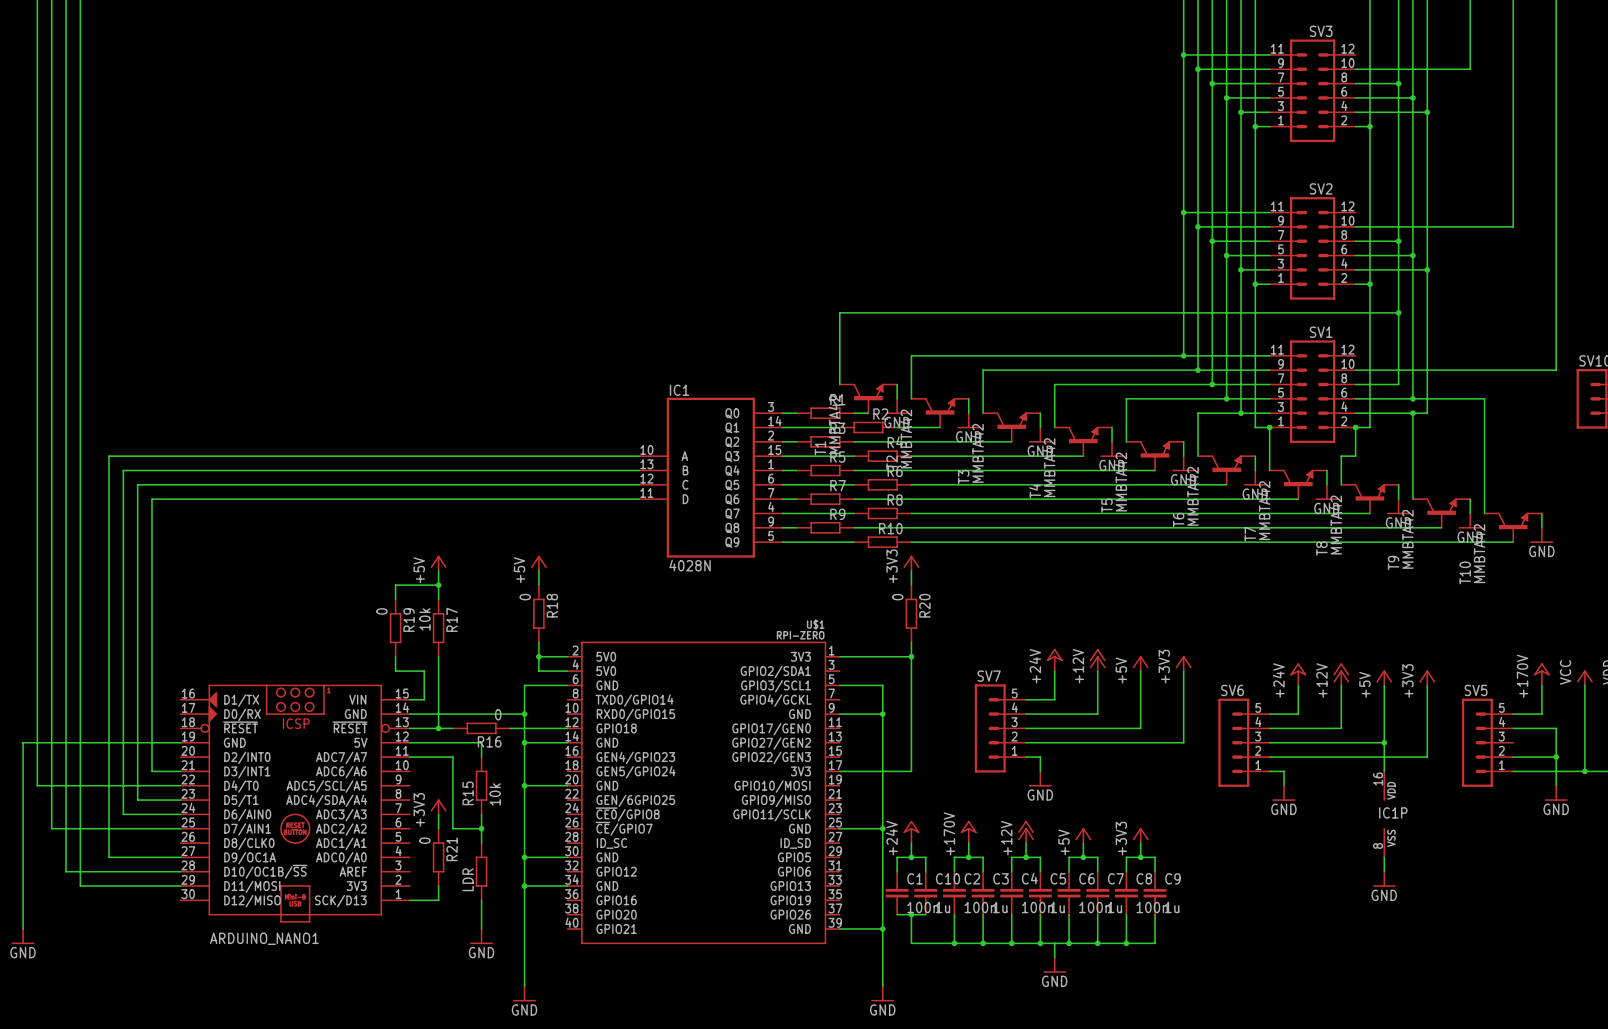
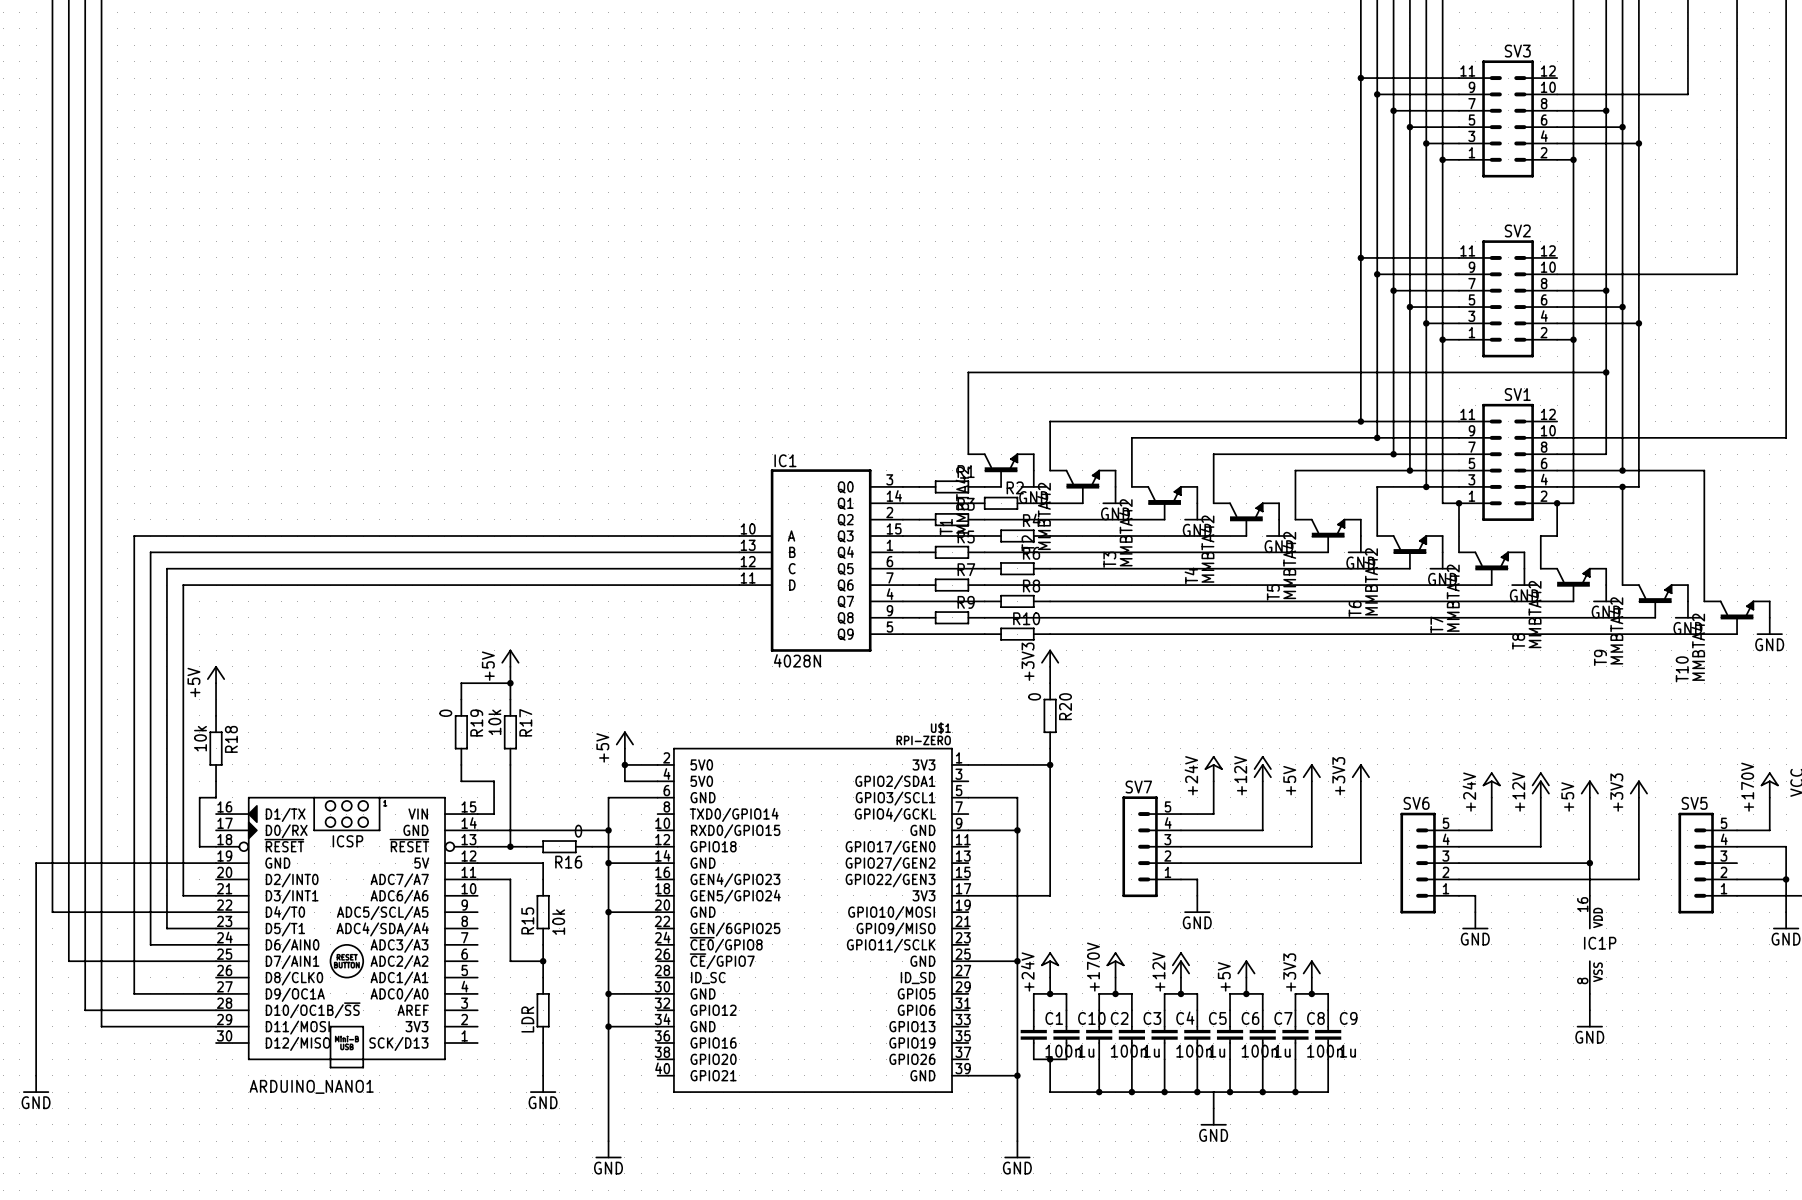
power symbol position: +5V (538, 563) -> +5V (624, 740)
wire: (538, 570) (538, 585) -> none
power symbol: none -> +5V (216, 674)
wire: none -> (216, 683) (216, 715)
R18 value: 0 (525, 597) -> 10k (200, 738)
R18 position: (538, 613) -> (216, 748)
wire: none -> (216, 781) (216, 797) (199, 797) (199, 846) (216, 846)
wire: (467, 742) (481, 742) (481, 757) -> (543, 863) (543, 879)
wire: (438, 757) (452, 757) (452, 828) -> (510, 879) (510, 944)
R15 position: (481, 785) -> (543, 912)
power symbol: +3V3 (438, 806) -> none
wire: (481, 814) (481, 843) -> (543, 944) (543, 977)
wire: (467, 828) (481, 828) -> (510, 961) (526, 961)
junction position: (481, 828) -> (543, 961)
R21: 0 (438, 857) -> none
LDR position: (481, 871) -> (543, 1010)
wire: (438, 886) (438, 900) (409, 900) -> none
wire: (481, 900) (481, 929) -> (543, 1043) (543, 1075)
power symbol position: GND (481, 936) -> GND (543, 1084)

